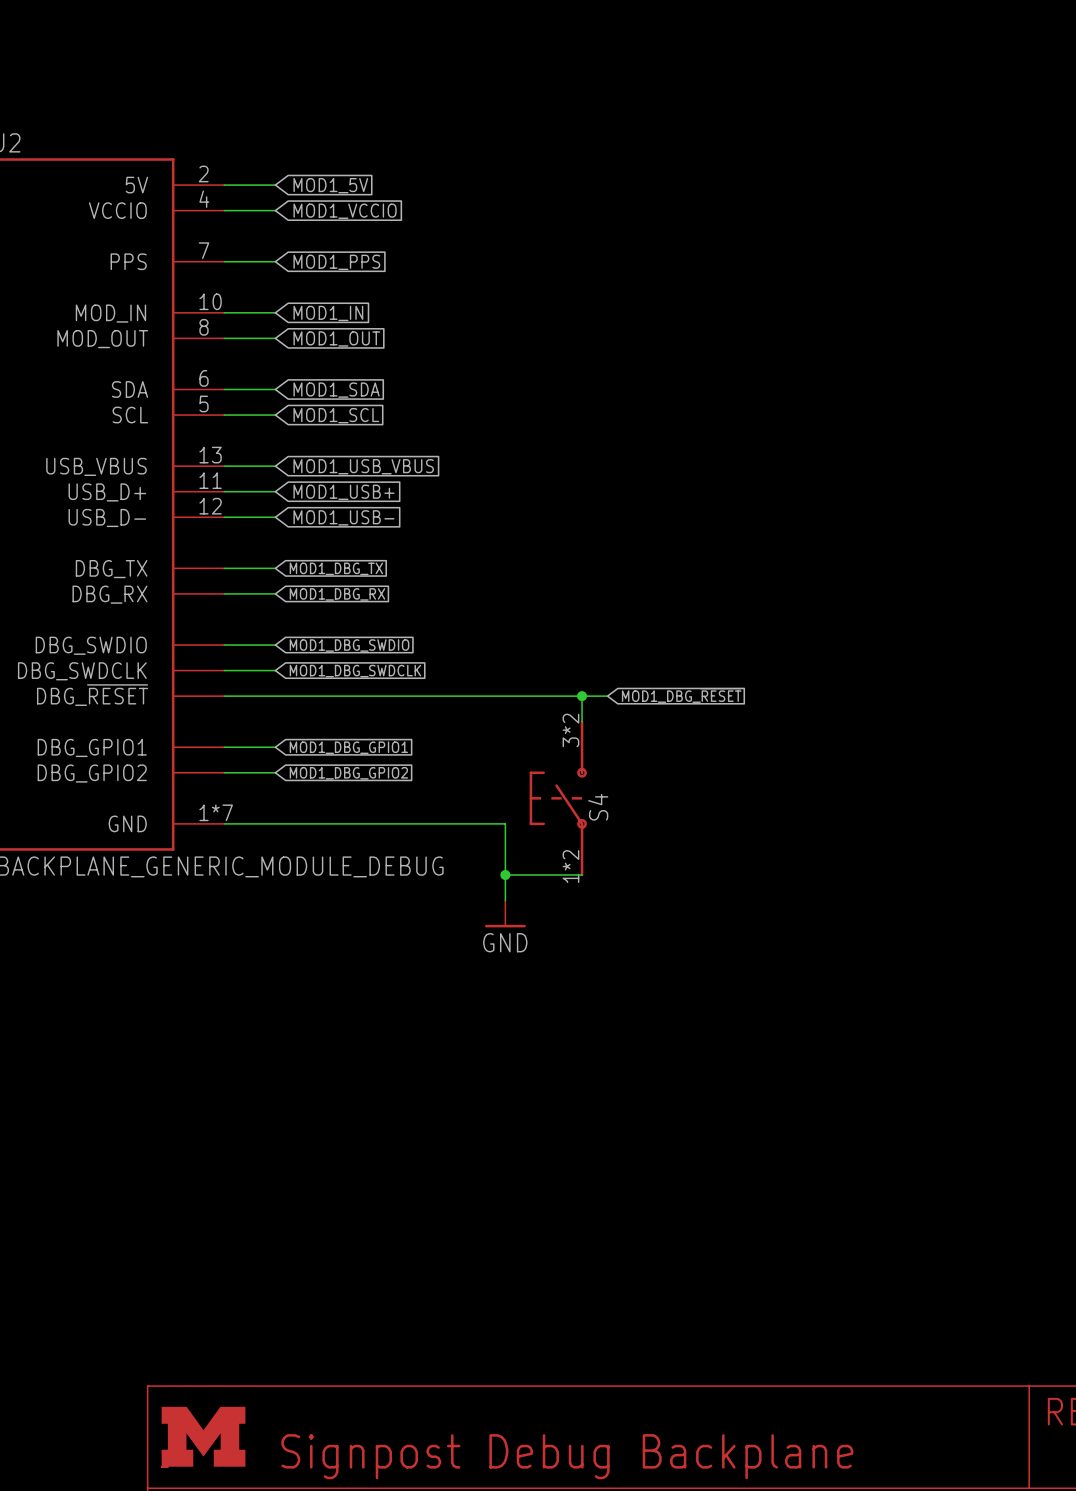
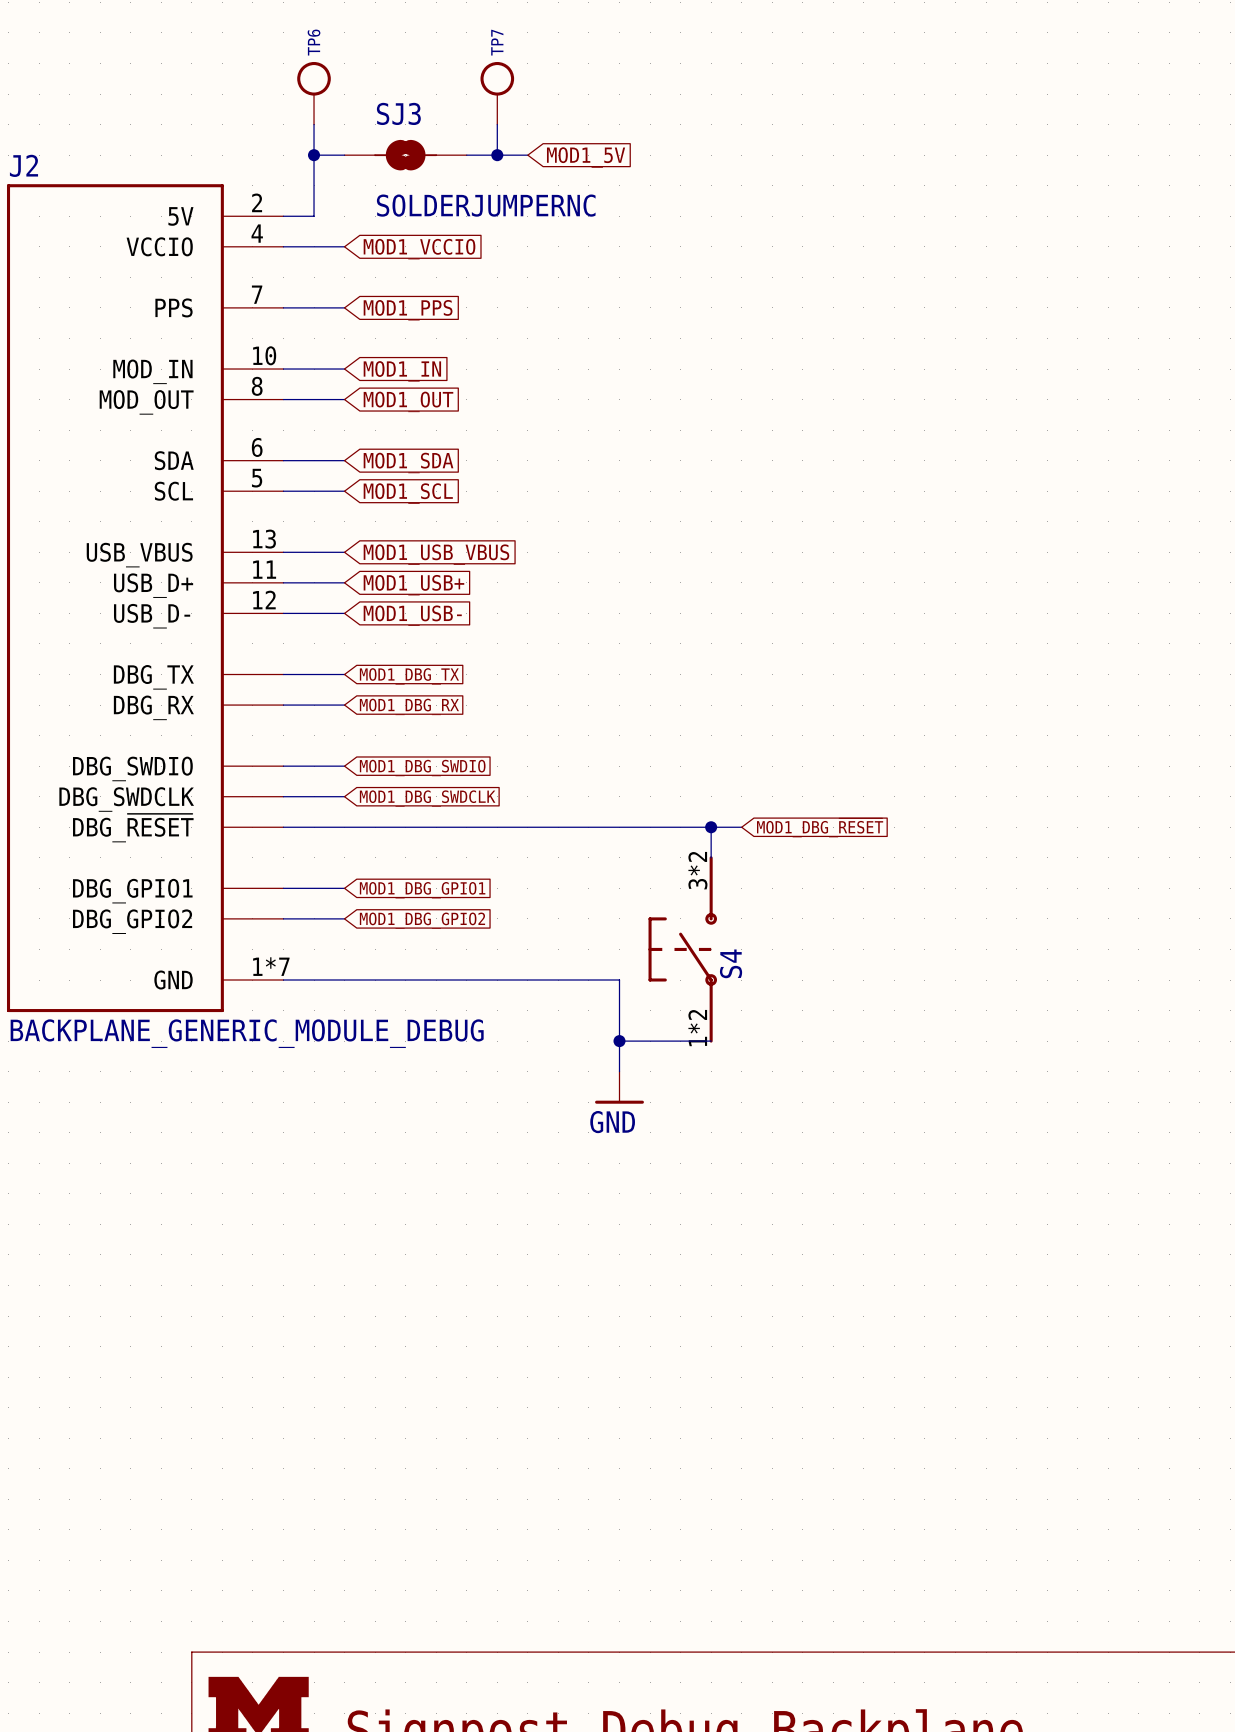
TP6: none -> (314, 93)
TP7: none -> (497, 93)
wire: none -> (497, 124) (497, 155)
wire: none -> (314, 155) (344, 155)
junction: none -> (314, 155)
SJ3: none -> SOLDERJUMPERNC (405, 155)
wire: none -> (466, 155) (527, 155)
junction: none -> (497, 155)
wire: (249, 185) (275, 185) -> (314, 216) (314, 124)
global label position: MOD1_5V (330, 185) -> MOD1_5V (586, 157)

